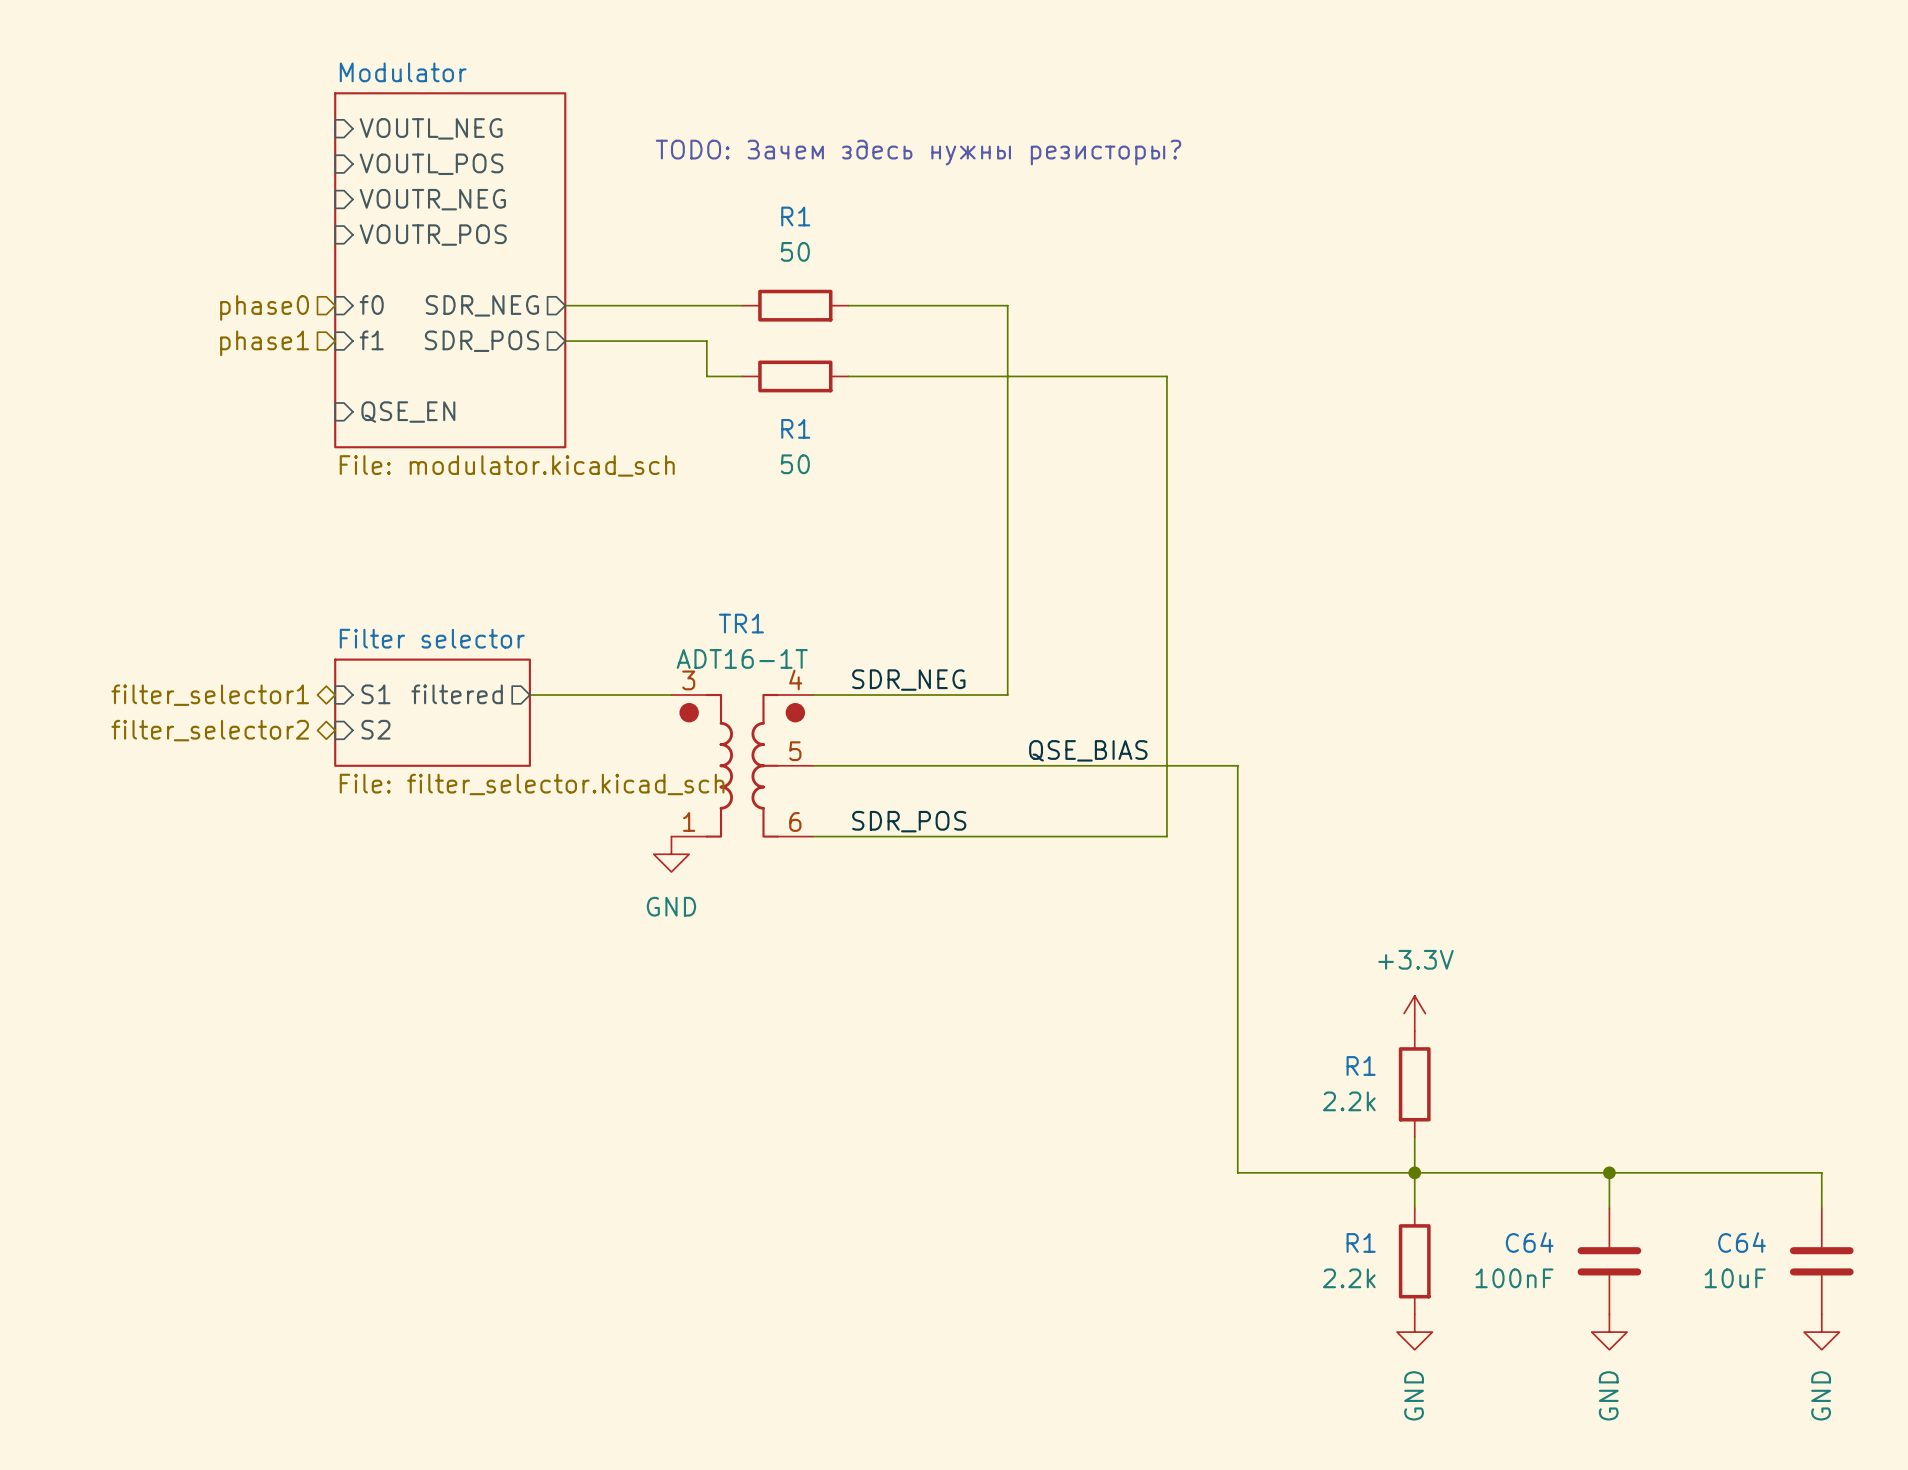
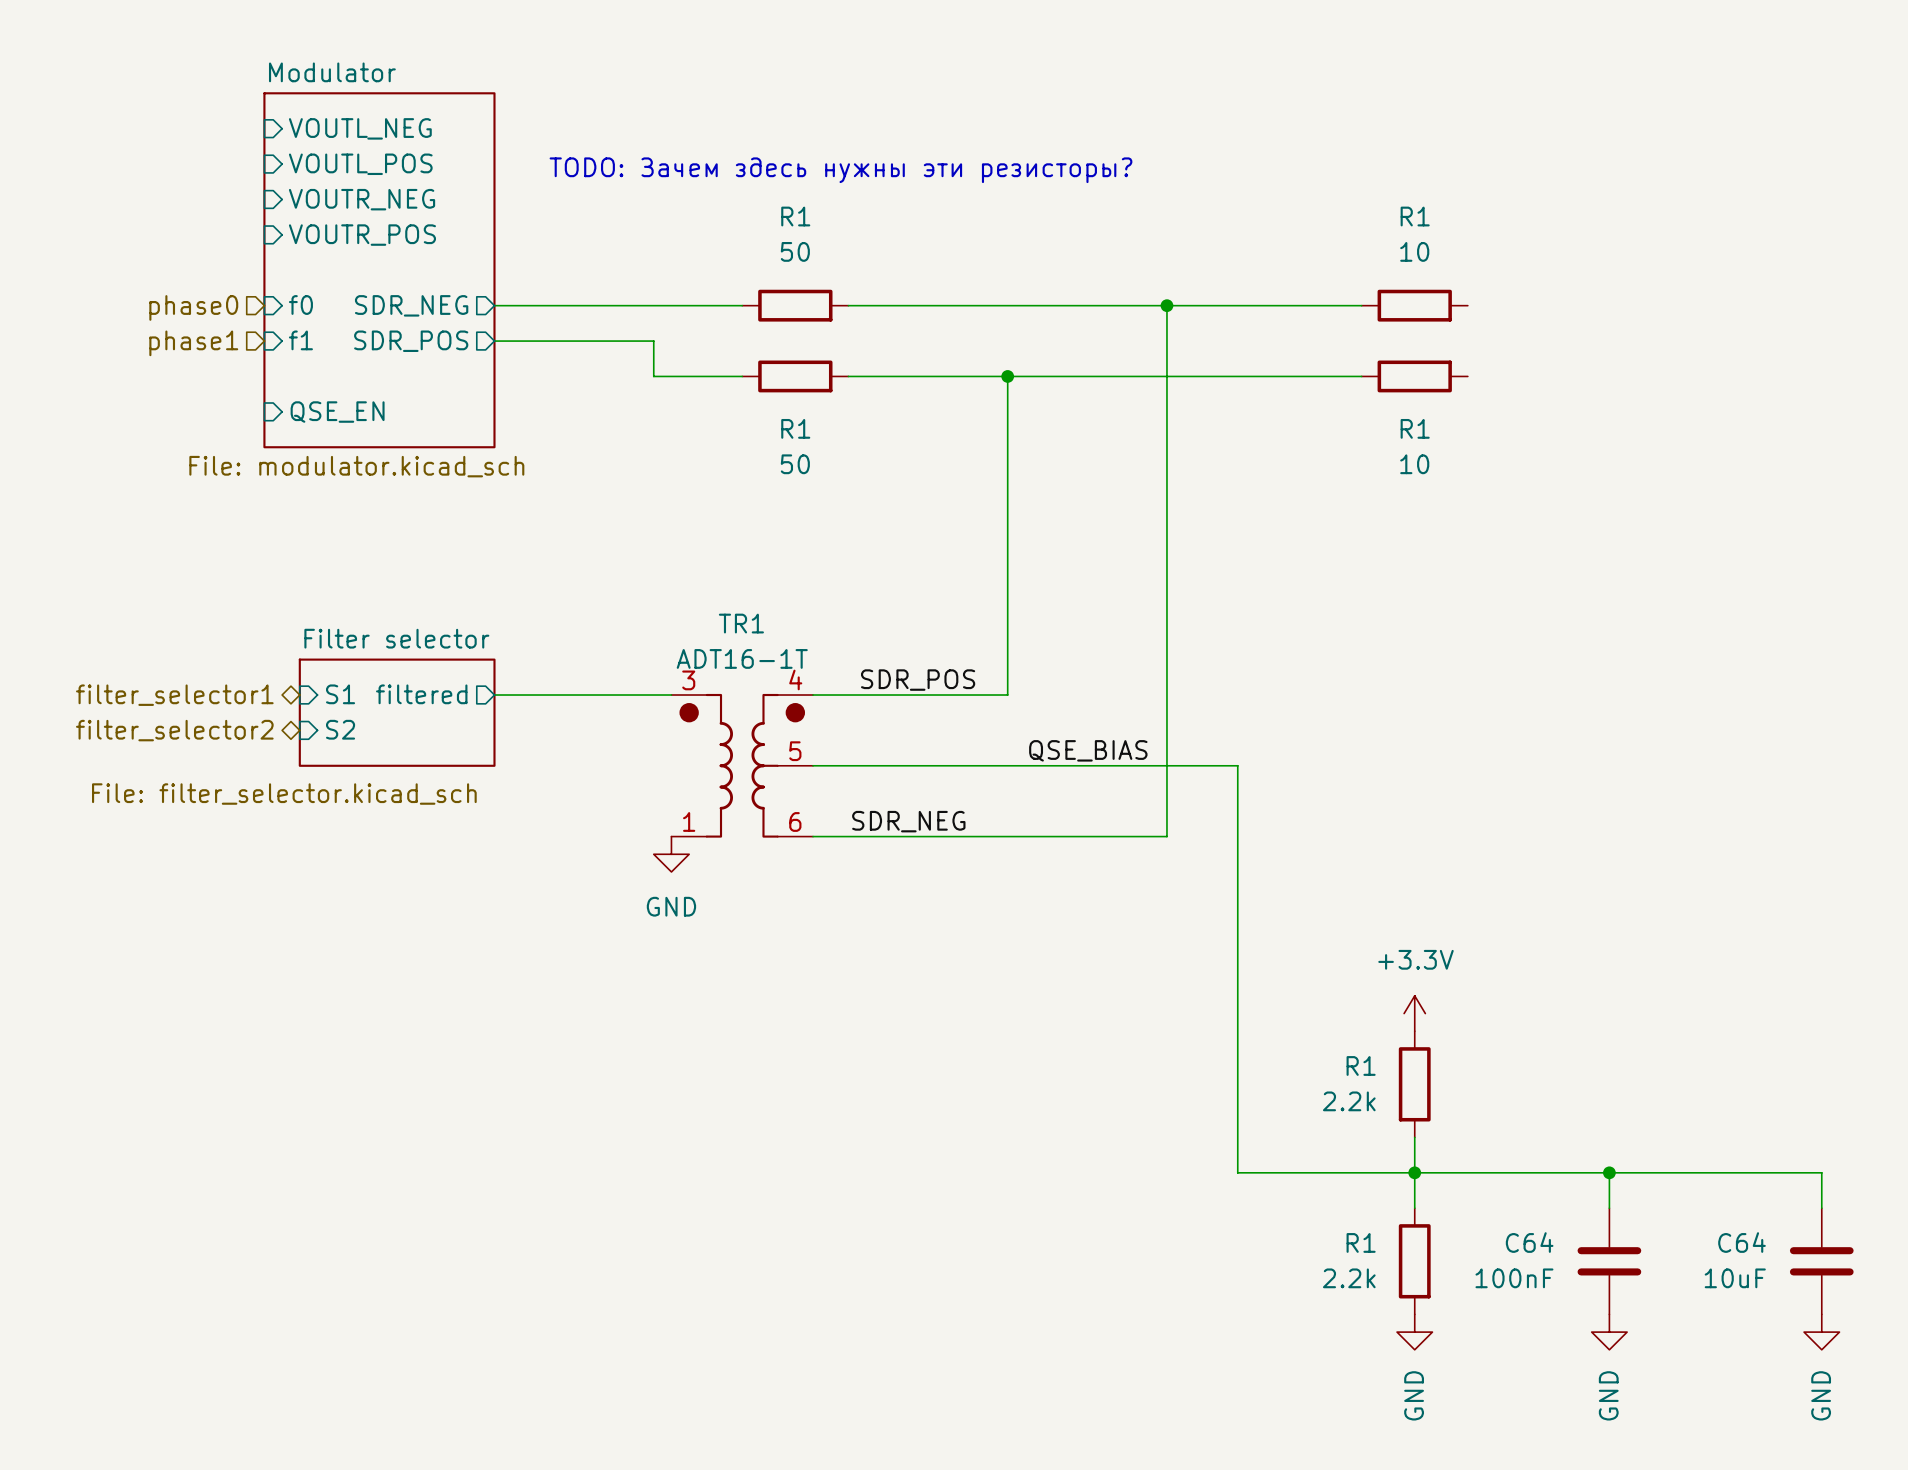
sheet pin position: VOUTL_NEG (431, 128) -> VOUTL_NEG (360, 128)
text: TODO: Зачем здесь нужны резисторы? (918, 152) -> TODO: Зачем здесь нужны эти резисторы? (840, 170)
sheet pin position: VOUTL_POS (431, 164) -> VOUTL_POS (360, 164)
sheet pin position: VOUTR_NEG (432, 199) -> VOUTR_NEG (362, 199)
sheet pin position: VOUTR_POS (433, 235) -> VOUTR_POS (362, 235)
sheet Modulator position: (450, 270) -> (379, 270)
sheet pin position: f0 (371, 305) -> f0 (300, 305)
sheet pin position: SDR_NEG (482, 305) -> SDR_NEG (411, 305)
wire: none -> (494, 305) (565, 305)
wire: (1007, 305) (1007, 376) -> (1007, 305) (1361, 305)
wire: none -> (1166, 305) (1166, 376) (1361, 376)
junction: none -> (1166, 305)
R1: none -> 10 (1414, 305)
hierarchical label position: phase0 (264, 307) -> phase0 (193, 307)
sheet pin position: f1 (371, 340) -> f1 (300, 340)
sheet pin position: SDR_POS (481, 341) -> SDR_POS (411, 341)
wire: none -> (494, 341) (565, 341)
wire: (653, 341) (706, 341) (706, 376) -> (653, 341) (653, 376) (706, 376)
hierarchical label position: phase1 (264, 343) -> phase1 (193, 343)
junction: none -> (1007, 376)
R1: none -> 10 (1414, 376)
sheet pin position: QSE_EN (408, 412) -> QSE_EN (337, 412)
sheet Modulator value position: File: modulator.kicad_sch (507, 465) -> File: modulator.kicad_sch (356, 466)
label: SDR_NEG (908, 680) -> SDR_POS (918, 680)
sheet pin position: S1 (375, 694) -> S1 (340, 694)
sheet pin position: filtered (457, 694) -> filtered (421, 694)
hierarchical label position: filter_selector1 (210, 695) -> filter_selector1 (174, 695)
wire: none -> (494, 695) (529, 695)
sheet Filter selector position: (432, 712) -> (397, 712)
sheet pin position: S2 (375, 729) -> S2 (340, 729)
hierarchical label position: filter_selector2 (210, 730) -> filter_selector2 (174, 730)
sheet Filter selector value position: File: filter_selector.kicad_sch (532, 784) -> File: filter_selector.kicad_sch (284, 794)
label: SDR_POS (909, 821) -> SDR_NEG (908, 821)

